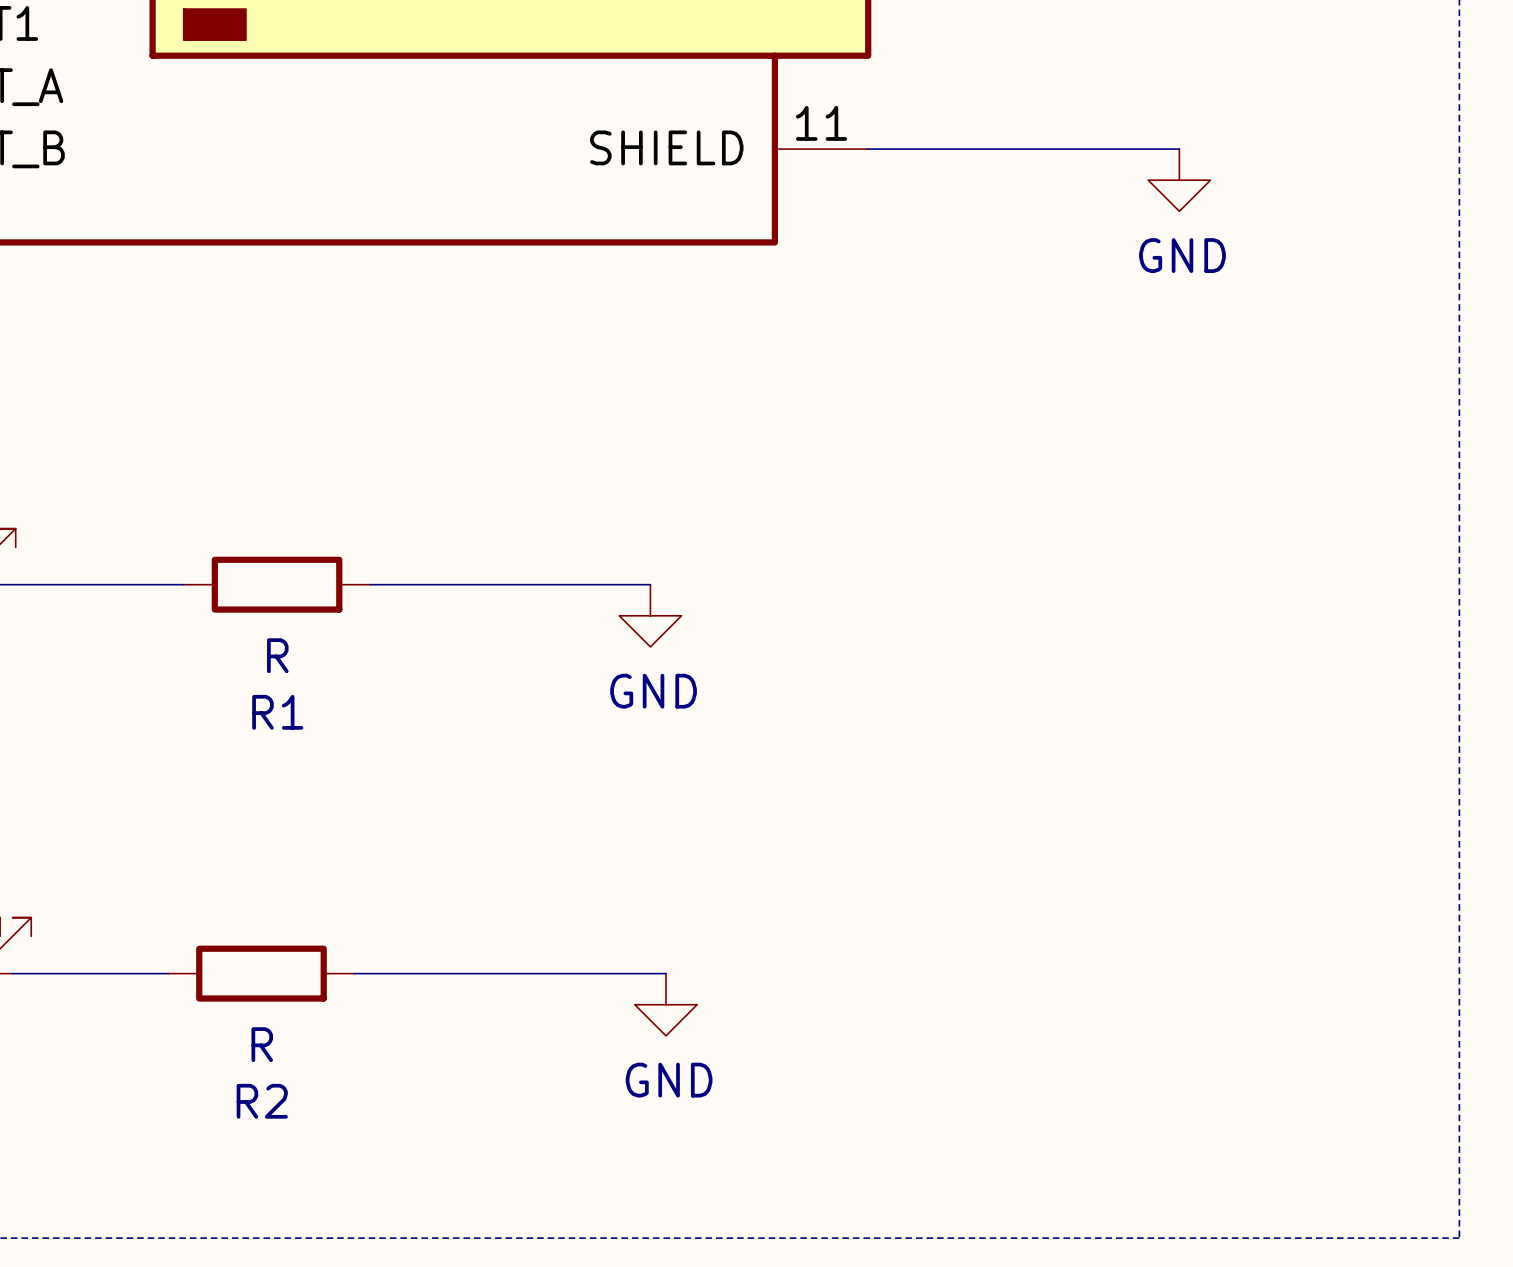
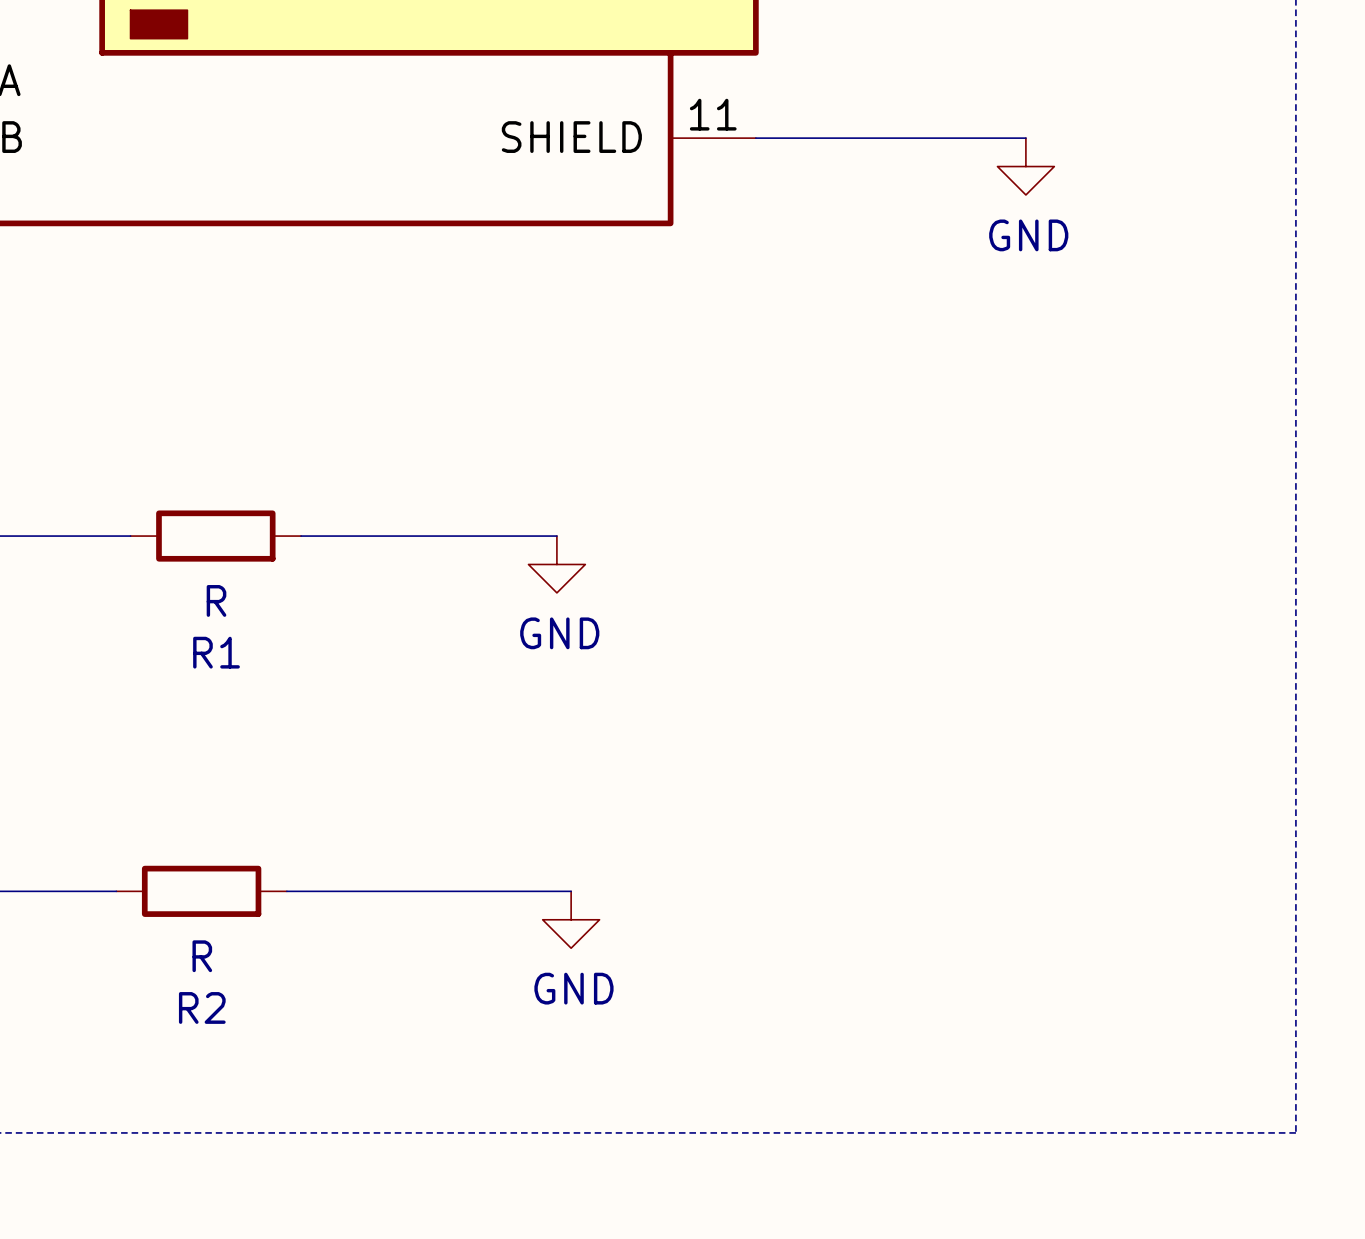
wire: (1163, 149) (1179, 149) -> none
power symbol position: GND (1179, 180) -> GND (1025, 166)

